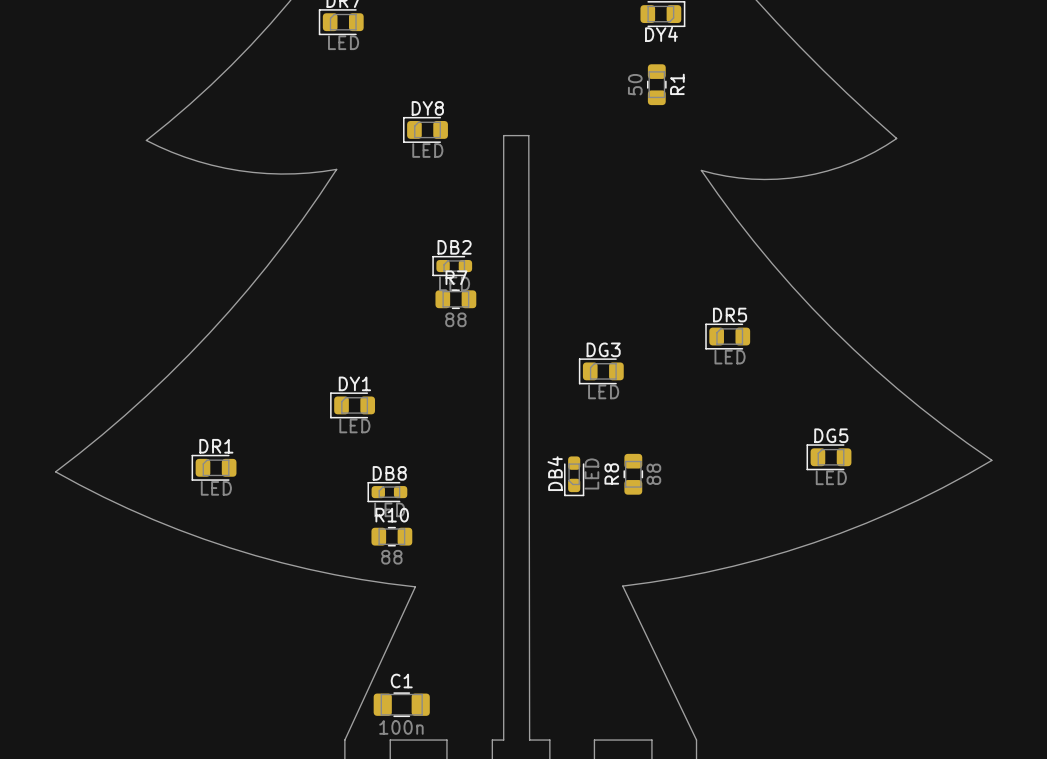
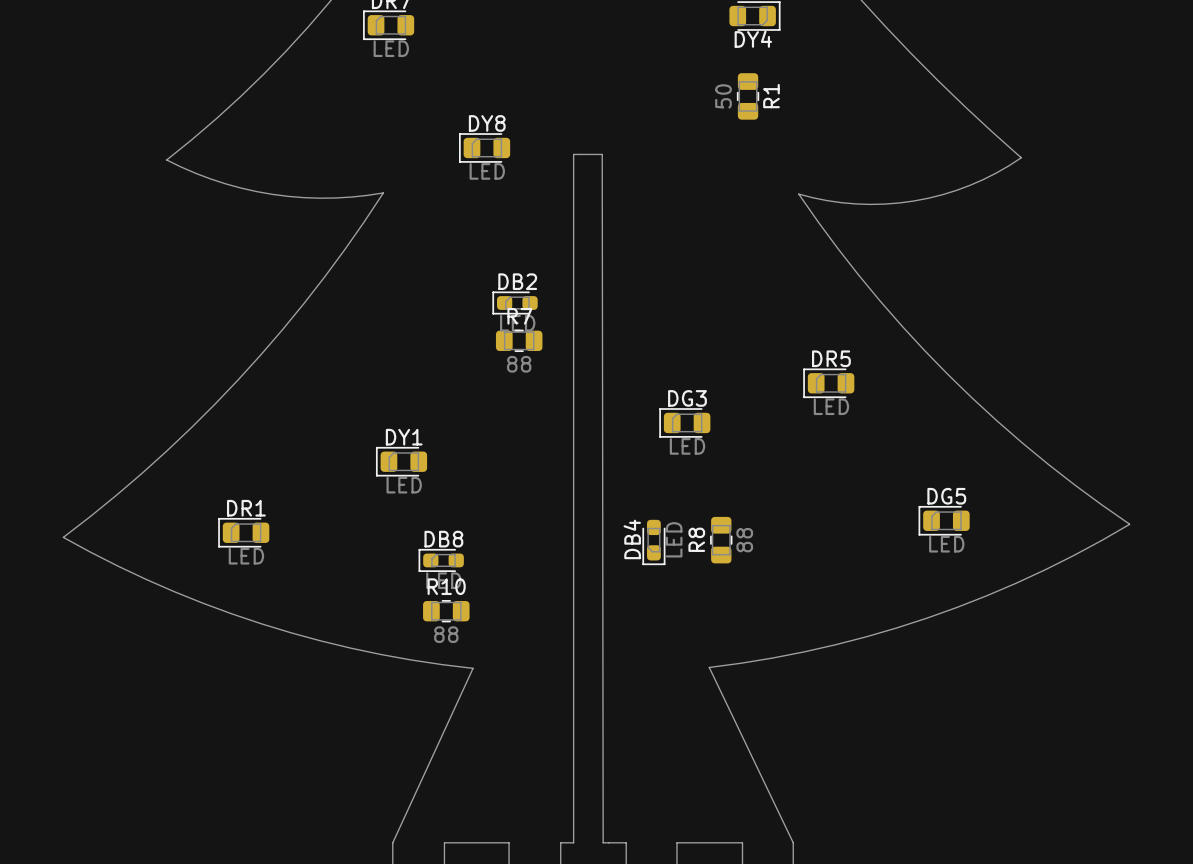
C1: 100n (401, 704) -> none

